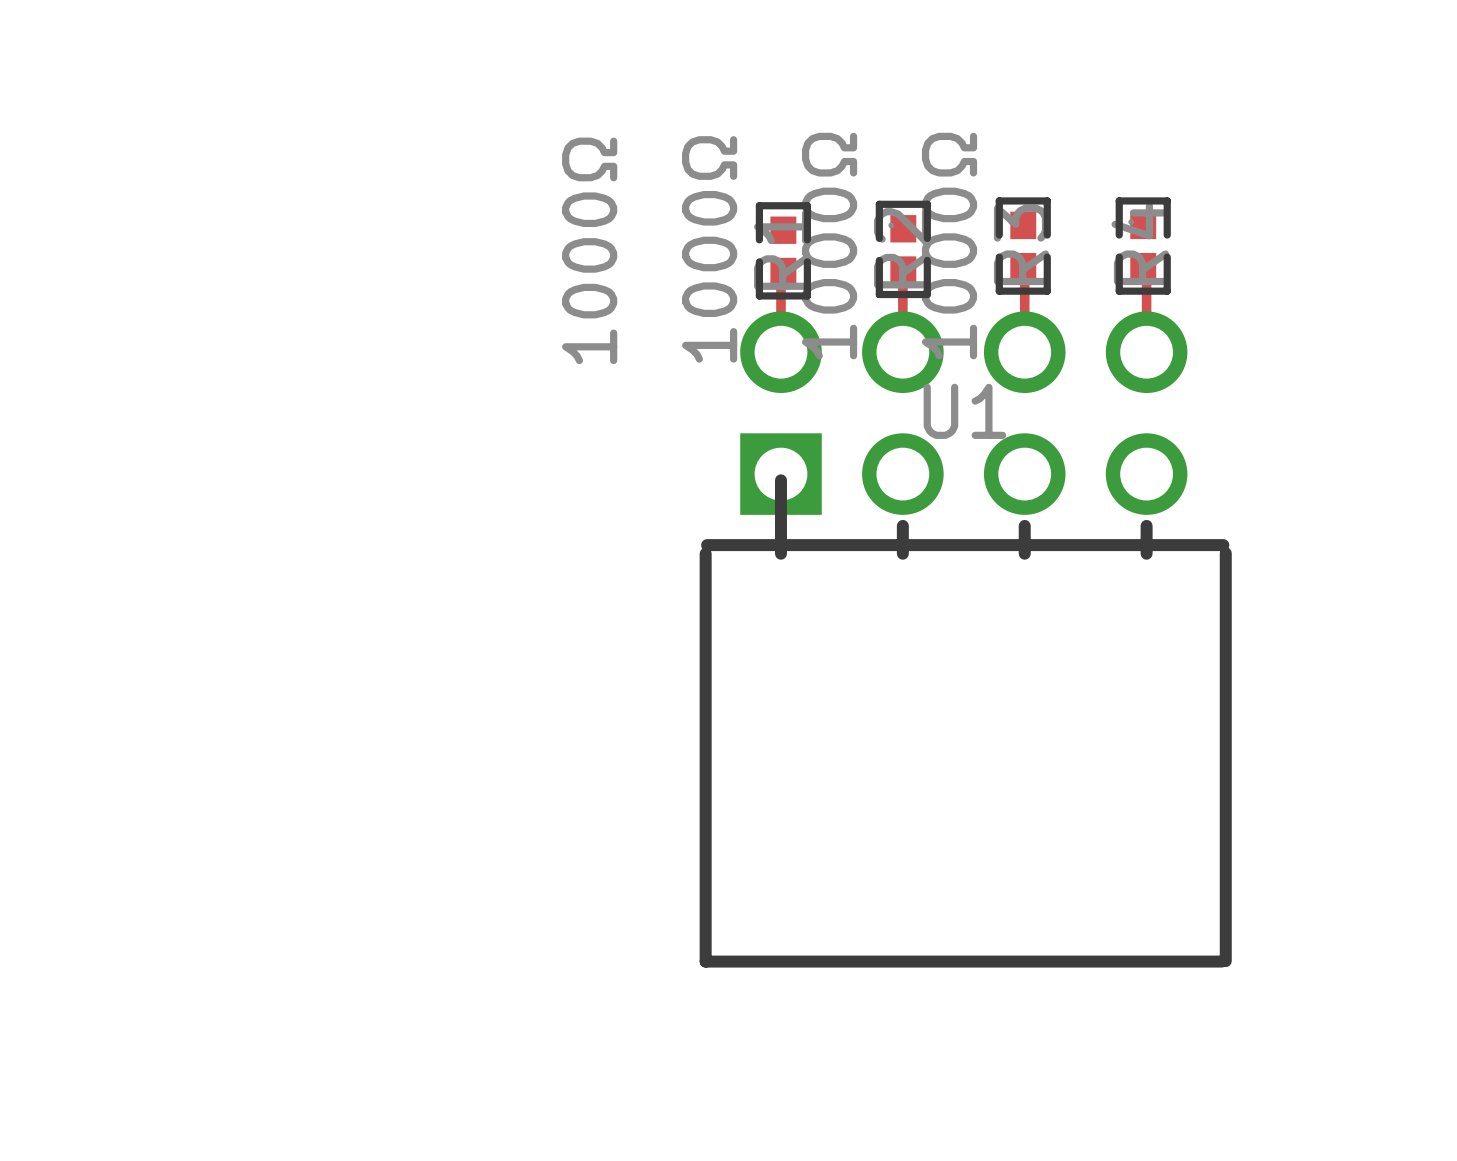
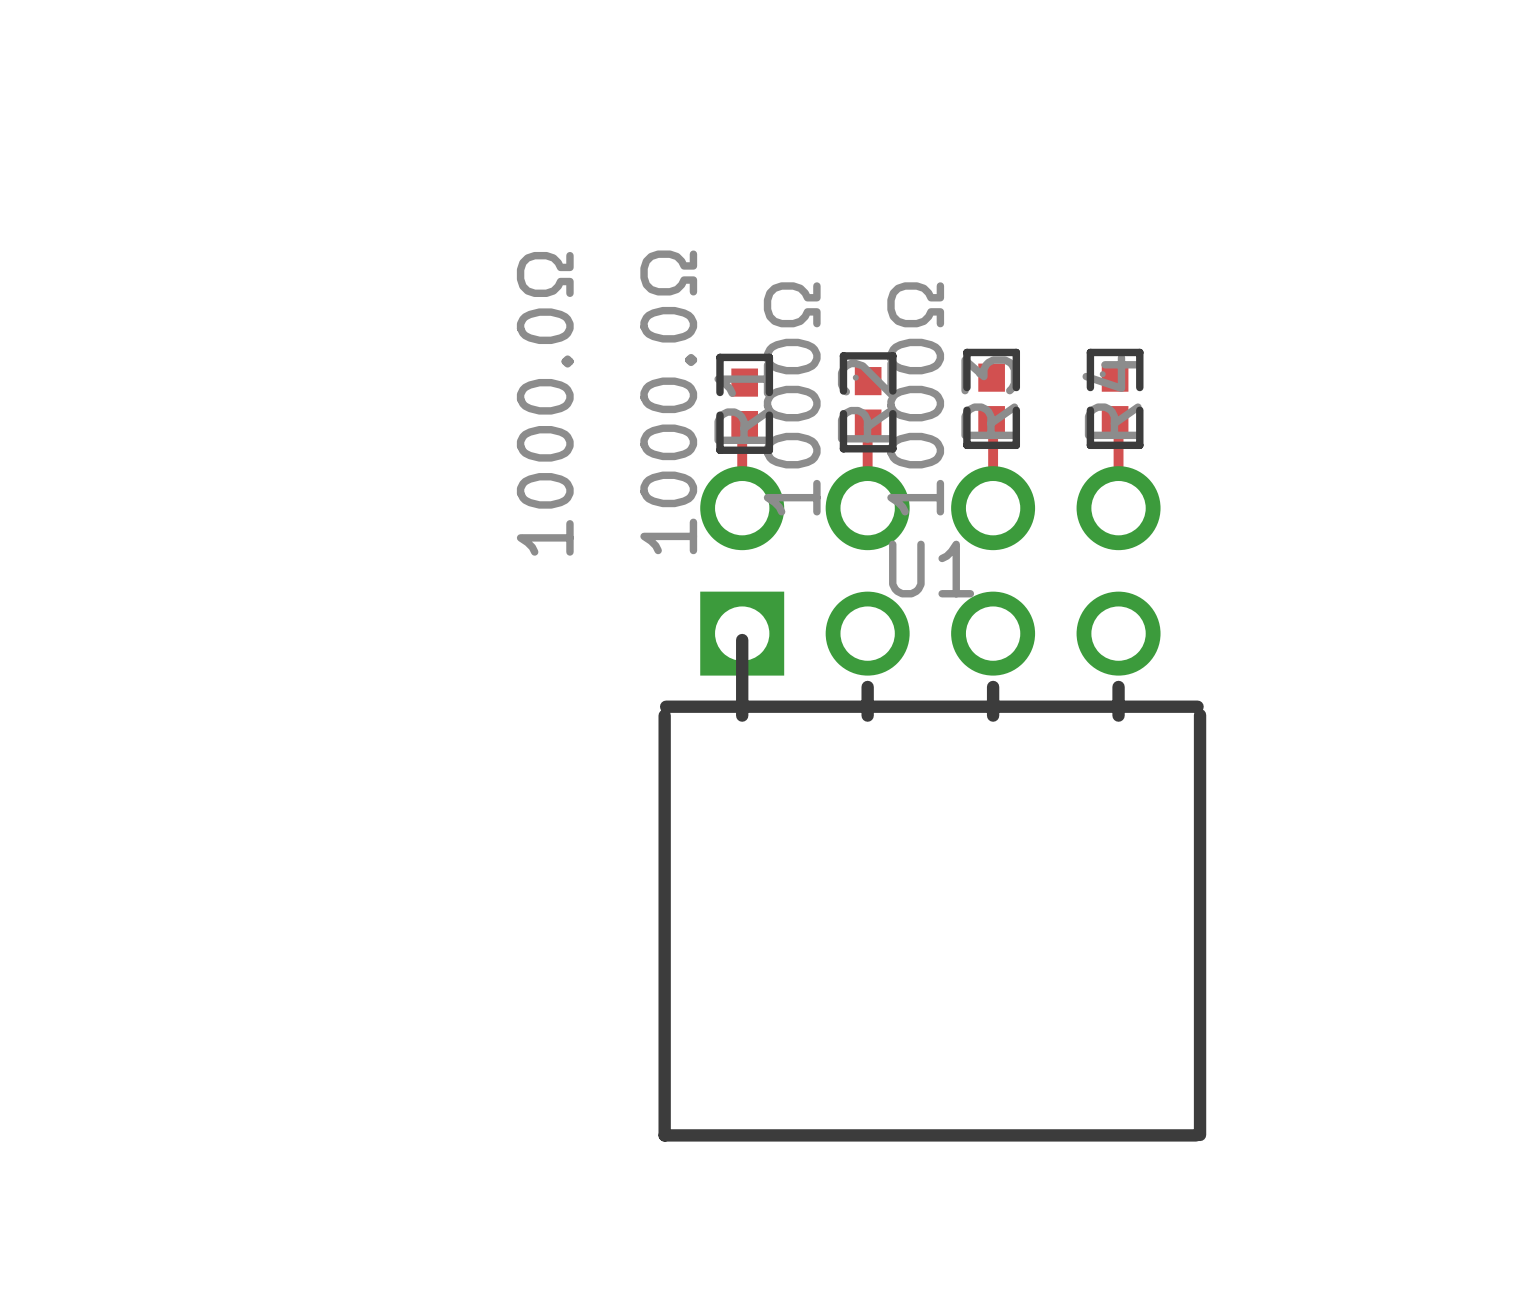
part value: 1000Ω (709, 249) -> 1000.0Ω (668, 402)
part value: 1000Ω (589, 250) -> 1000.0Ω (545, 403)

